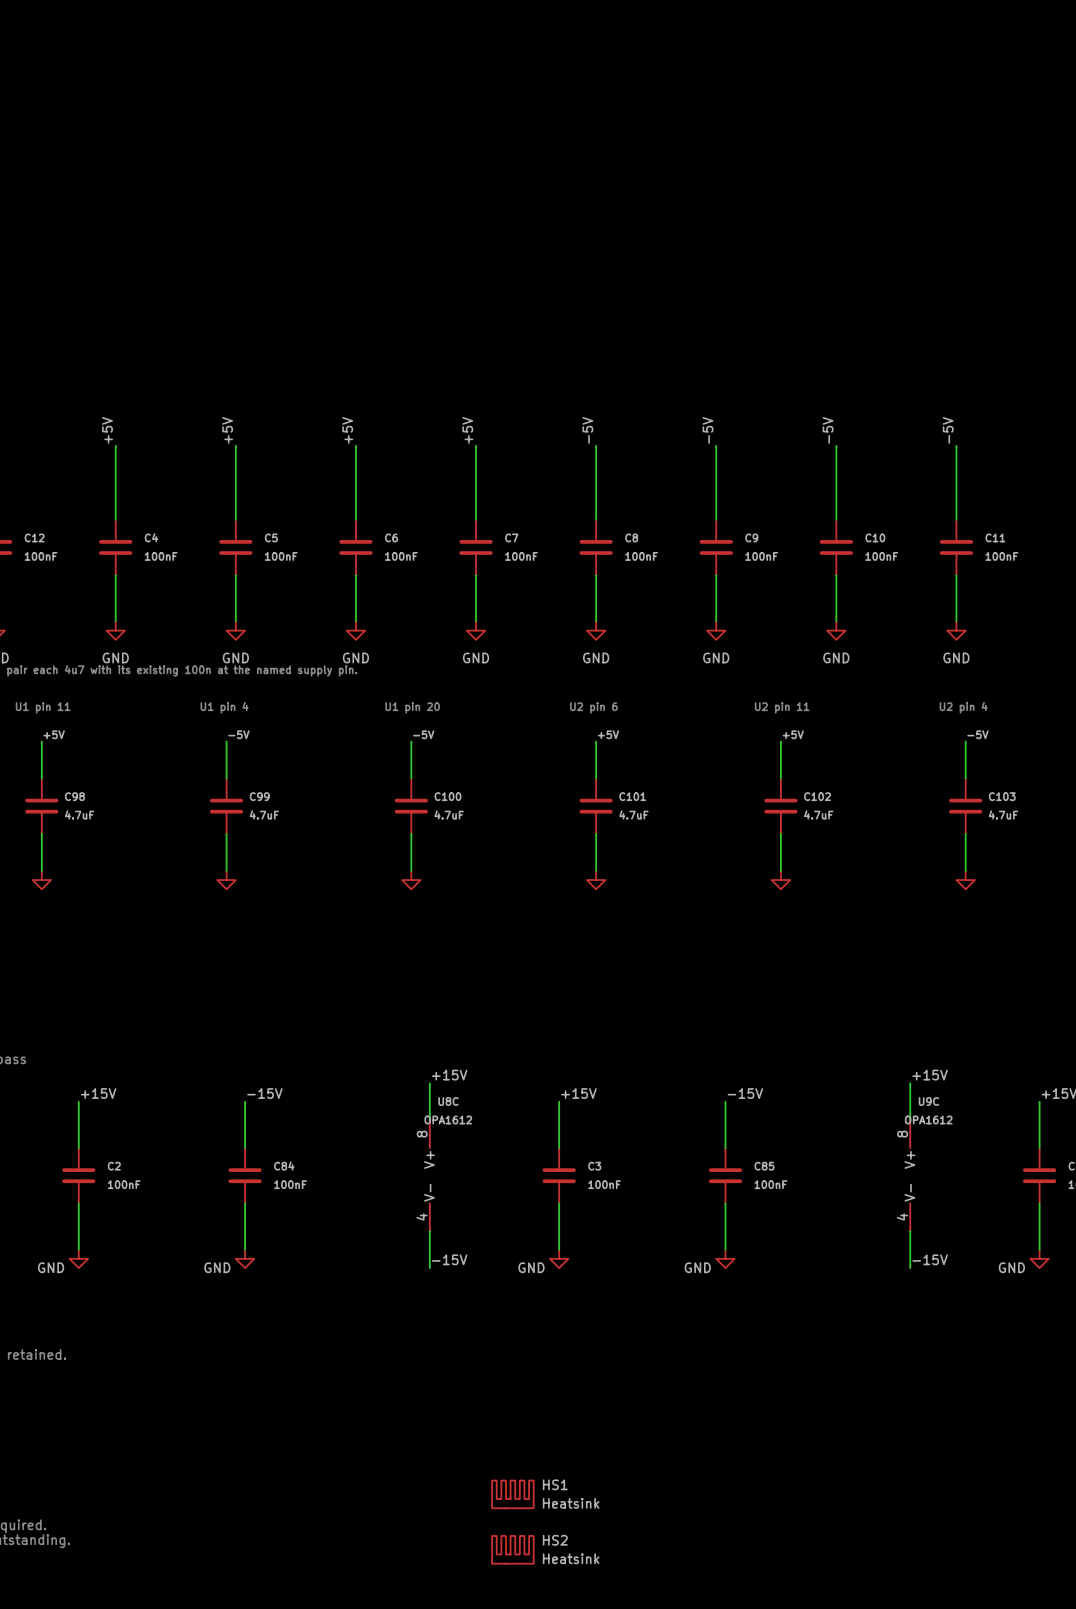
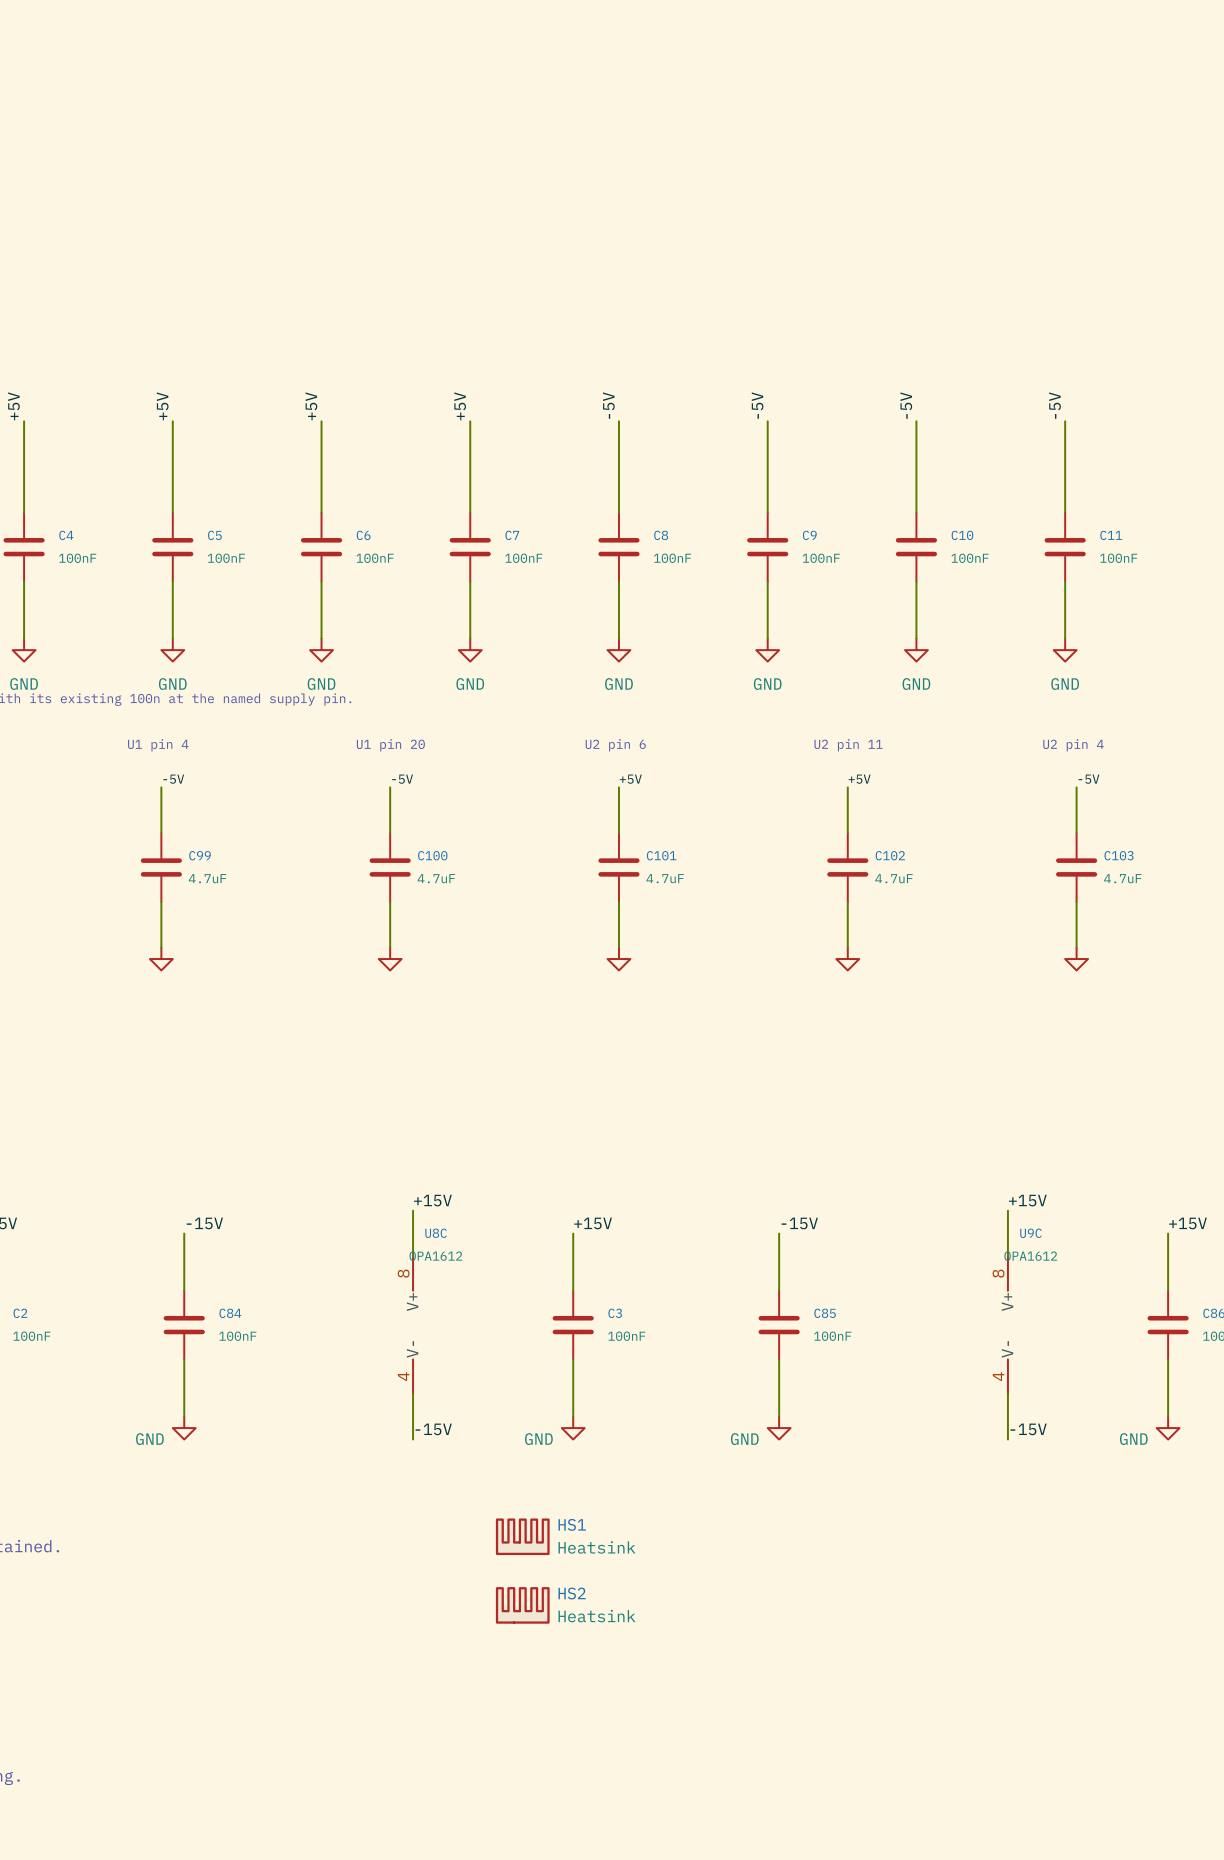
HS1 position: (512, 1494) -> (522, 1536)
HS2 position: (512, 1549) -> (522, 1605)

